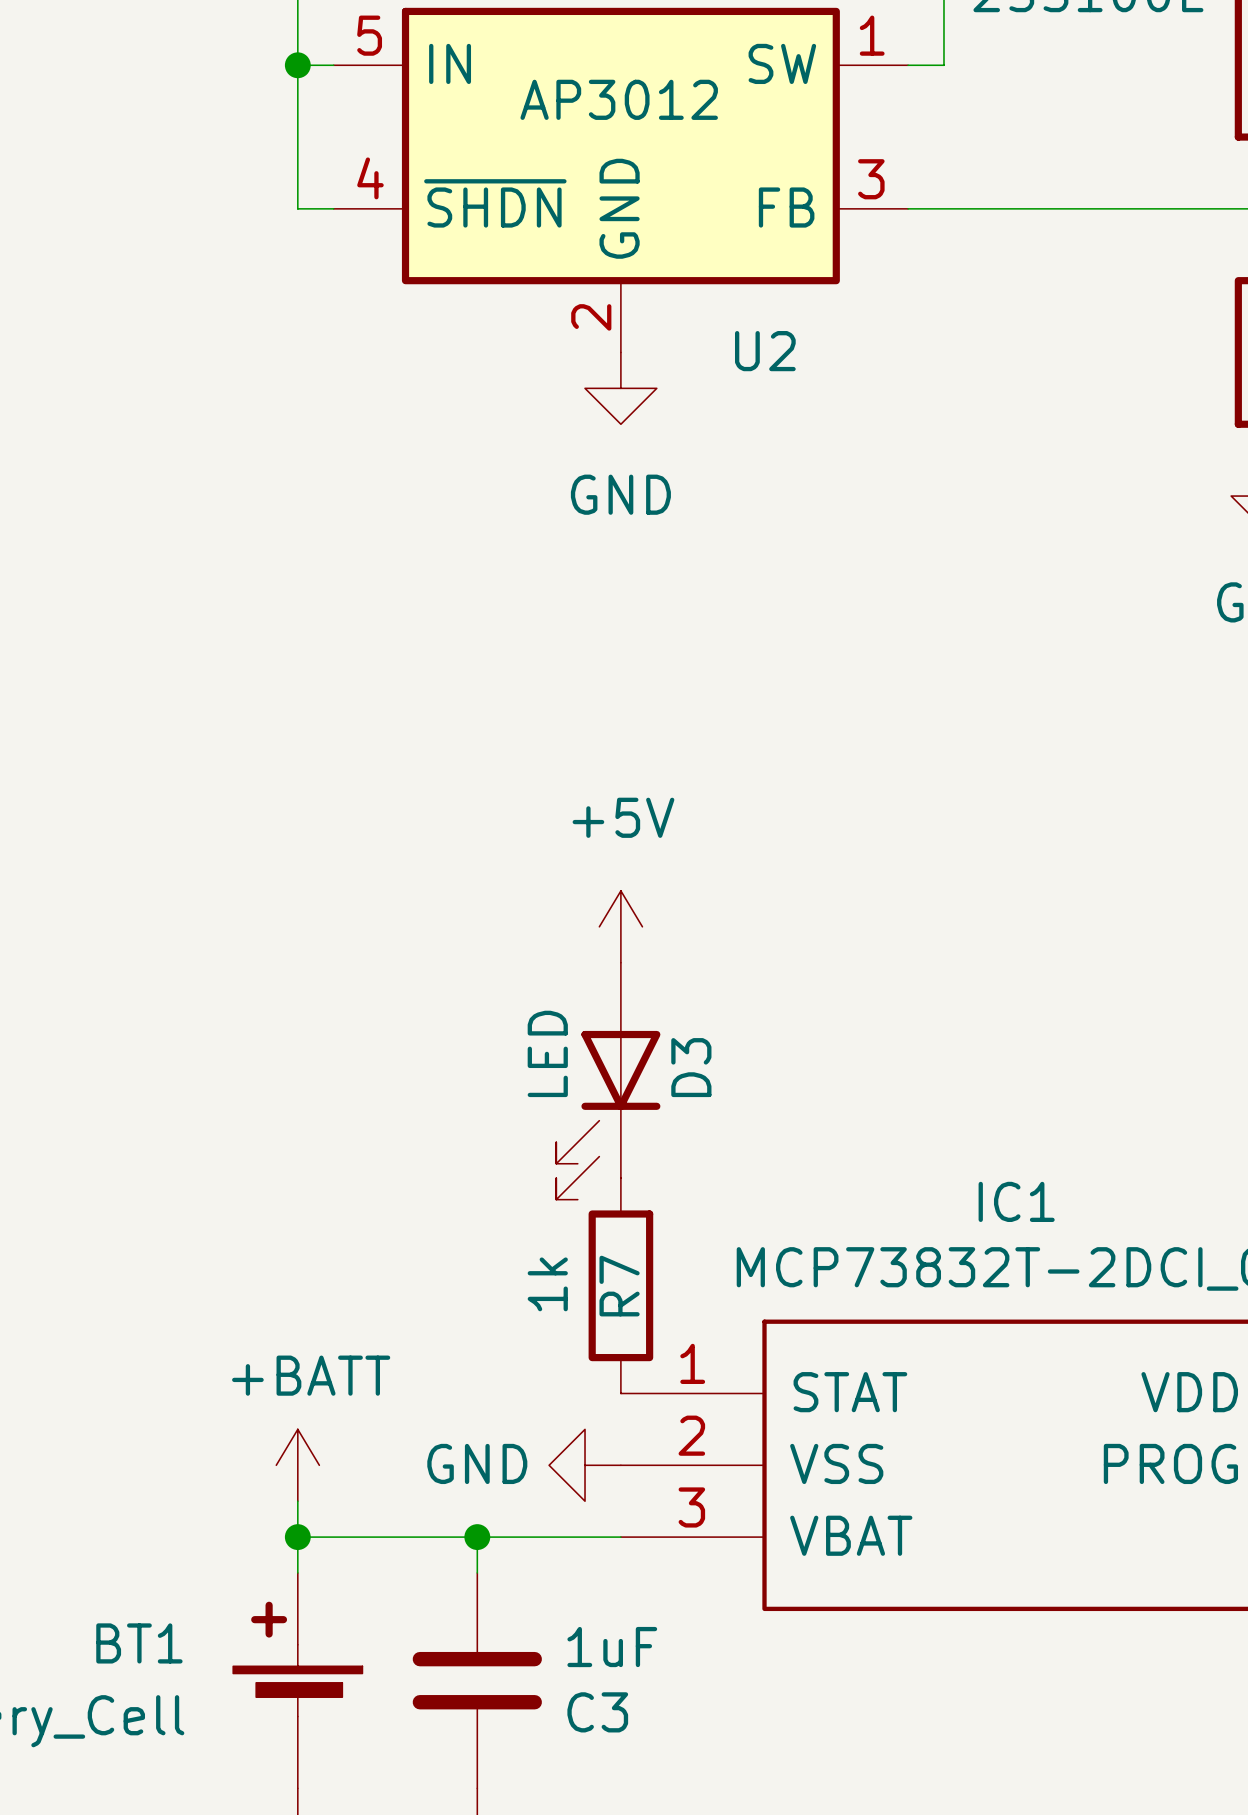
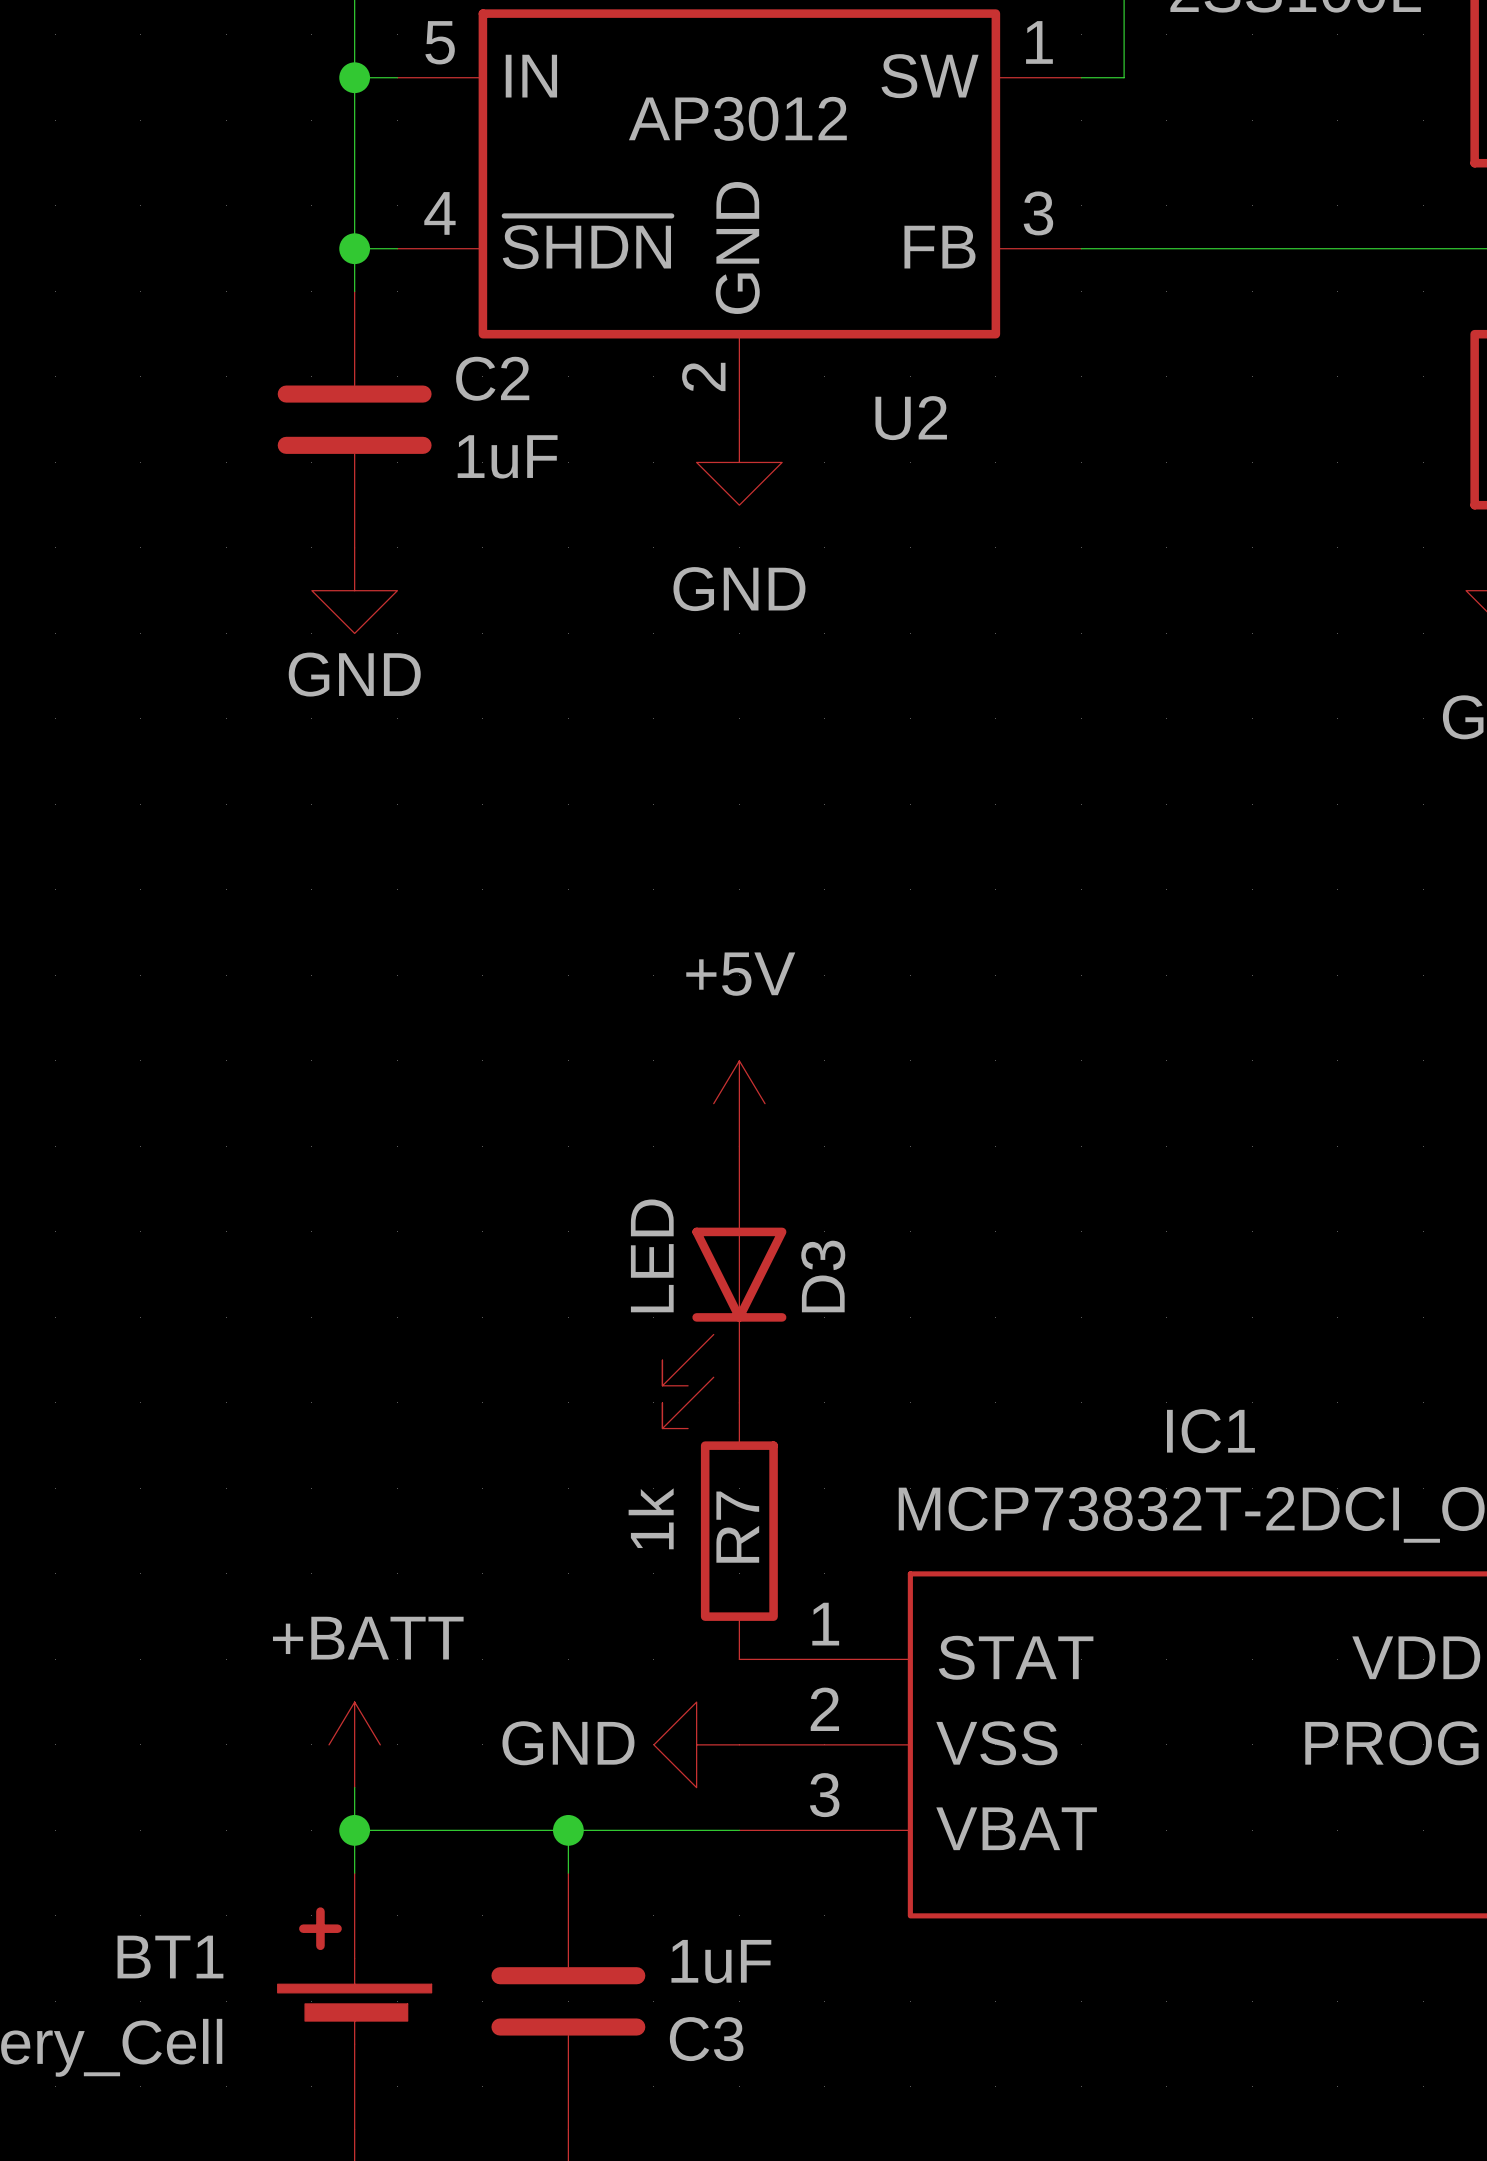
wire: none -> (354, 248) (354, 291)
junction: none -> (354, 248)
C2: none -> 1uF (354, 419)
power symbol: none -> GND (354, 590)

